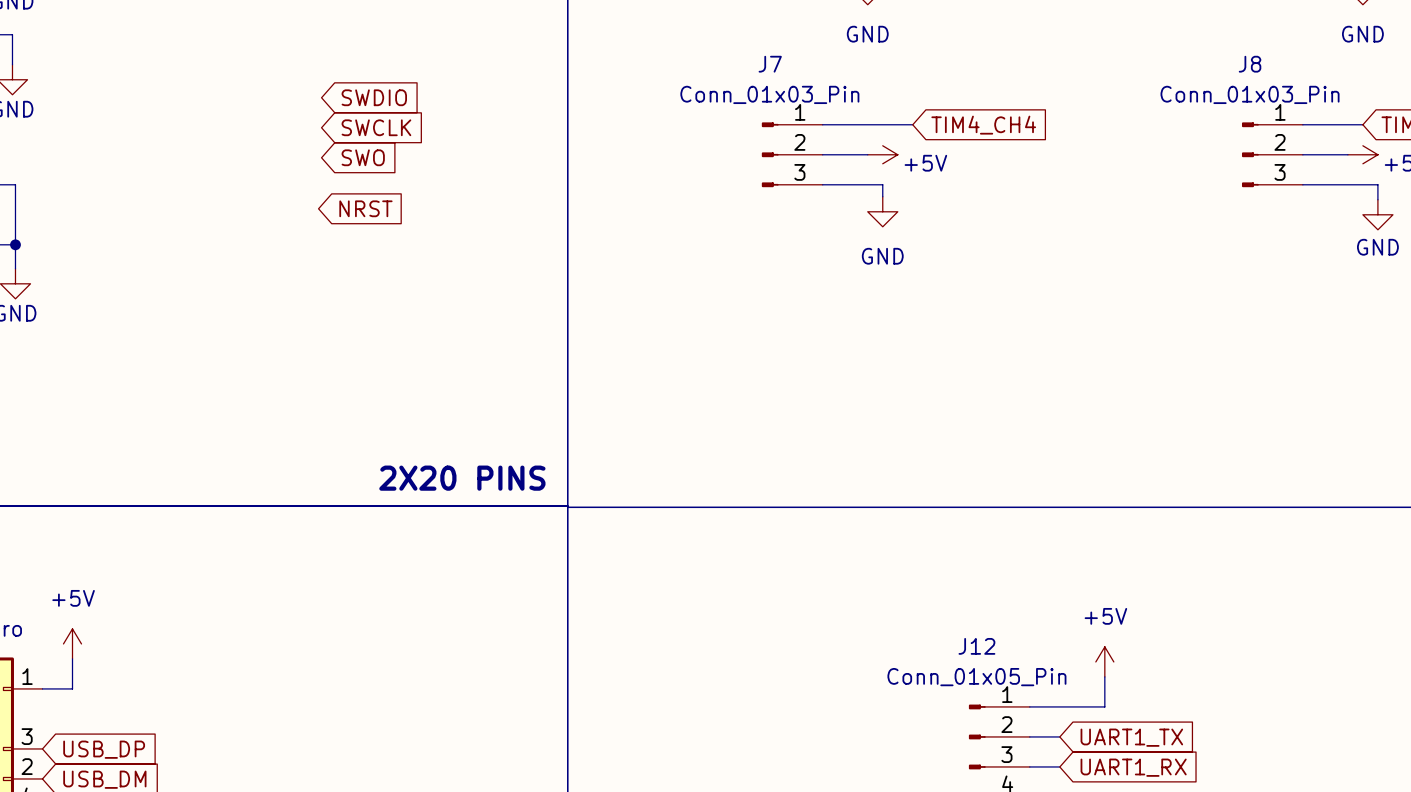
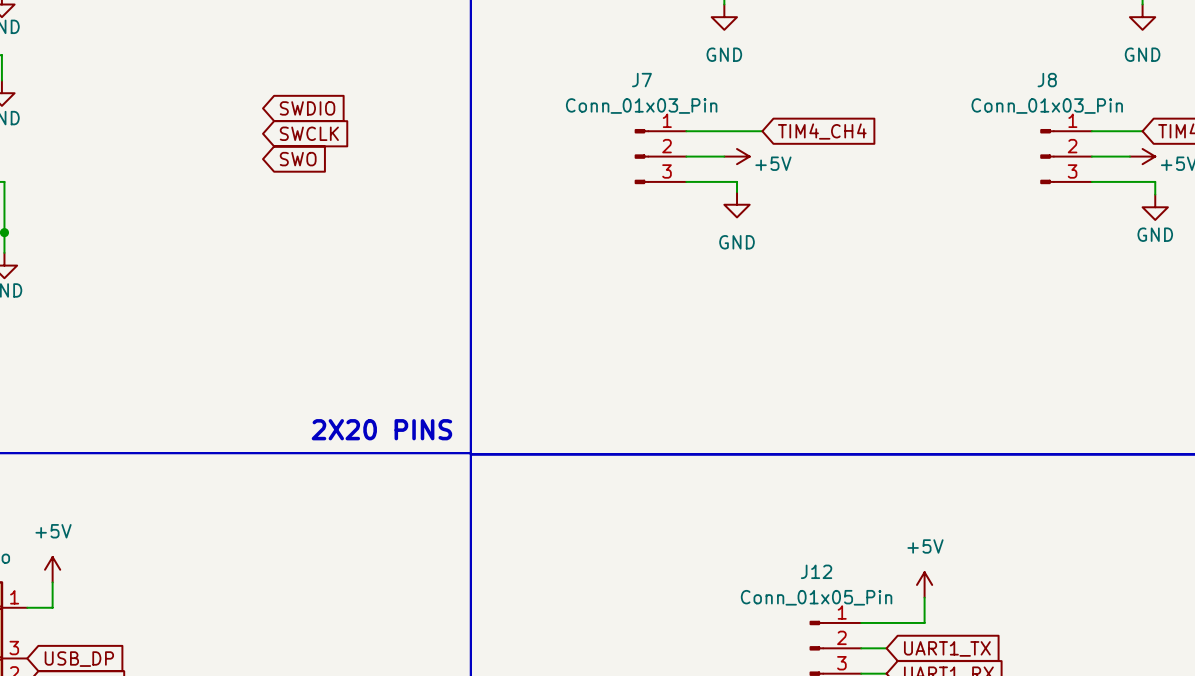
global label: NRST (365, 208) -> none

